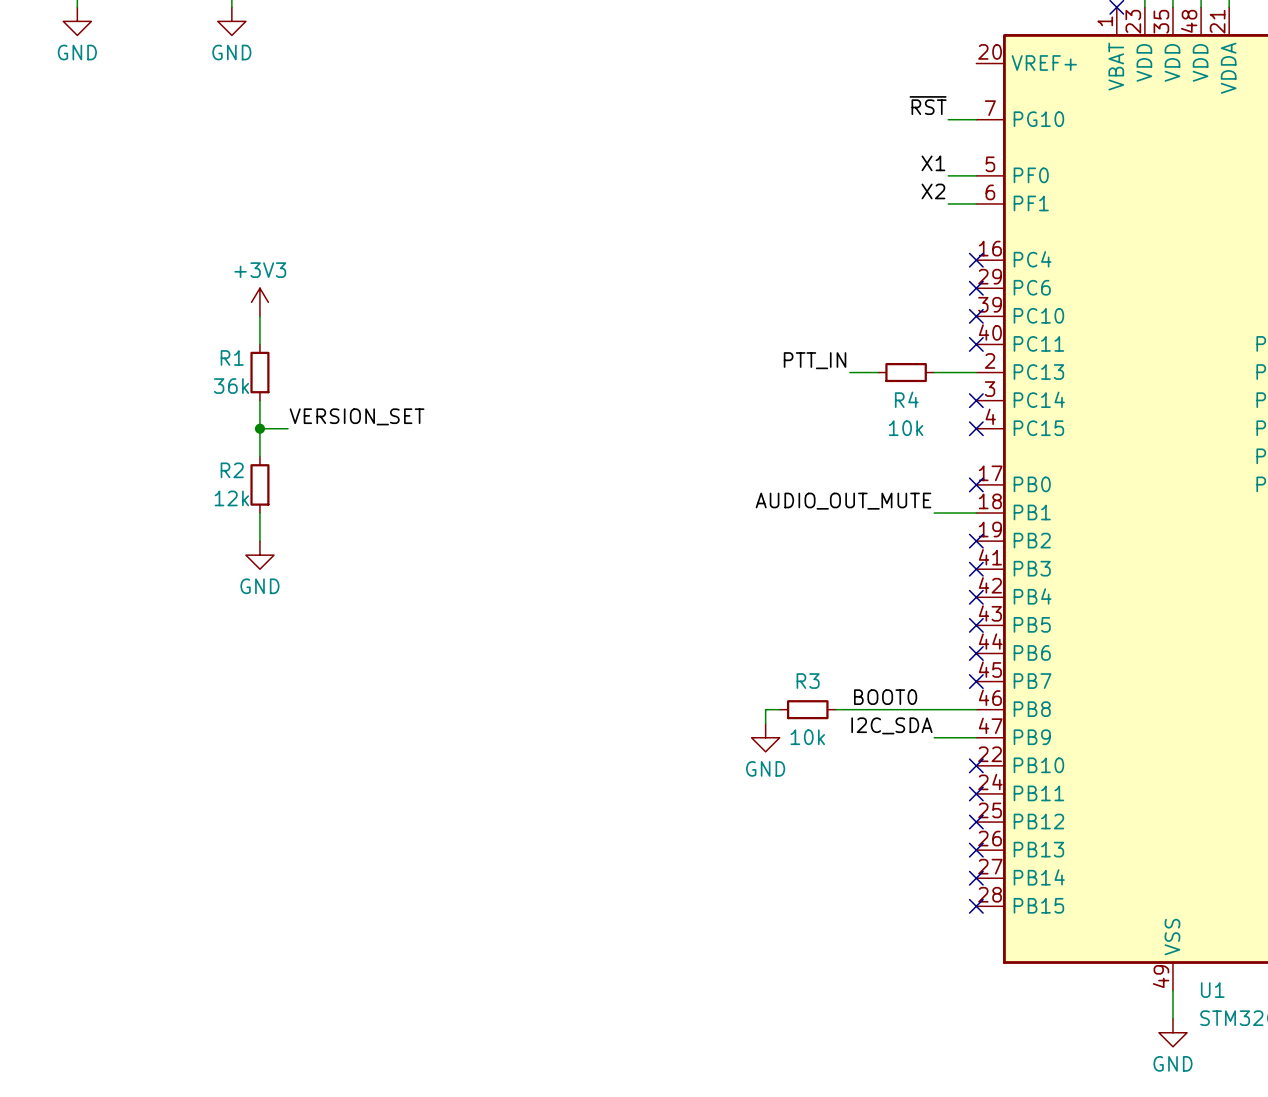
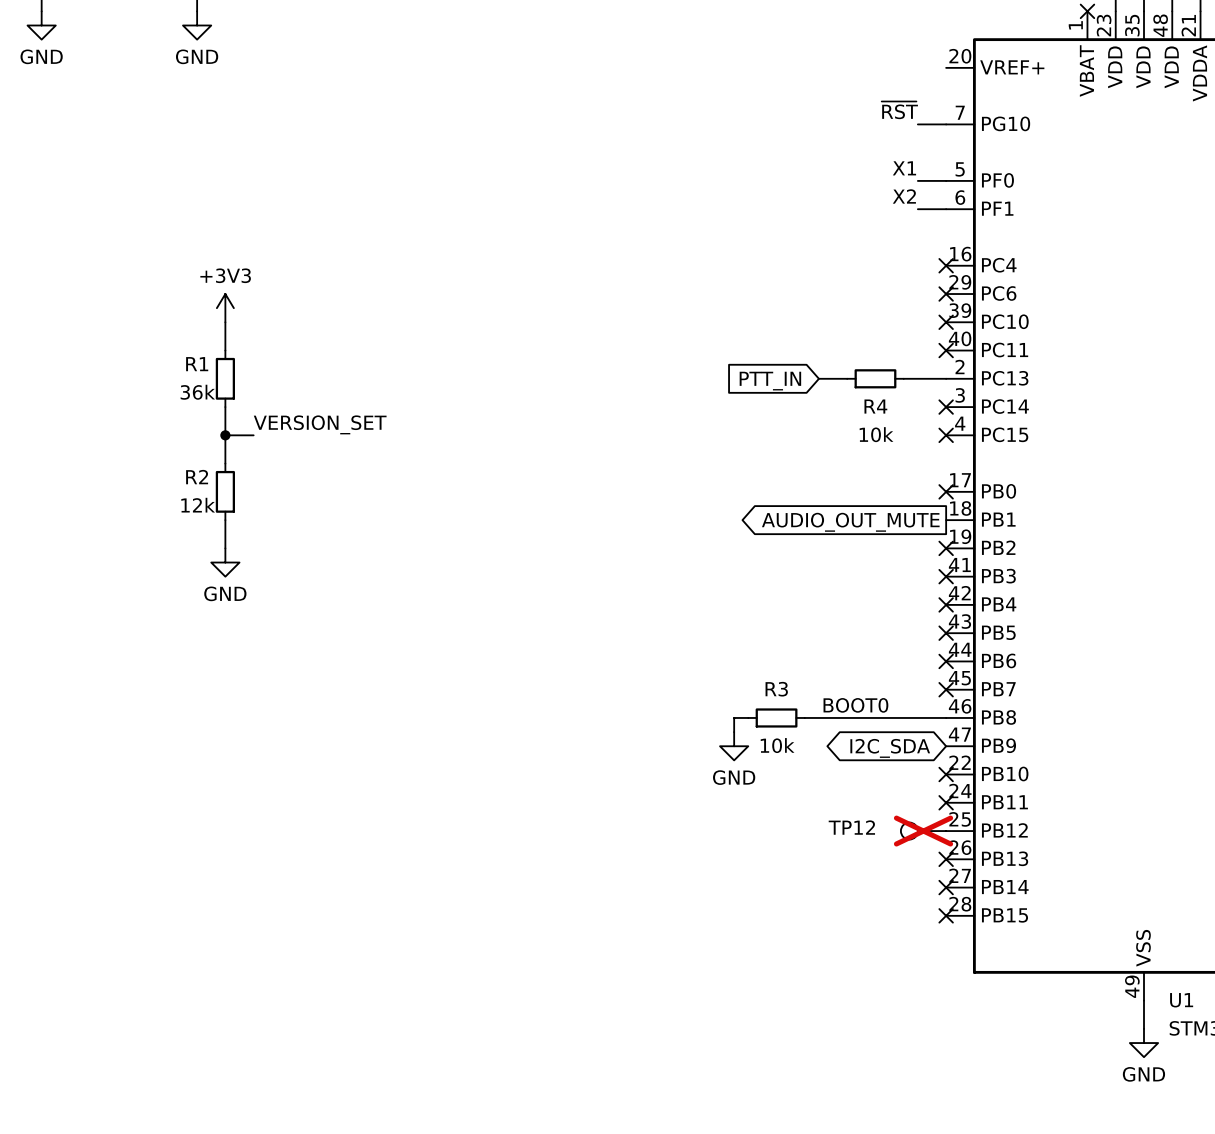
label: PTT_IN (815, 360) -> none
global label: none -> PTT_IN (770, 381)
label: AUDIO_OUT_MUTE (843, 501) -> none
global label: none -> AUDIO_OUT_MUTE (850, 522)
wire: (934, 513) (976, 513) -> none
label: I2C_SDA (891, 725) -> none
wire: (934, 737) (976, 737) -> none
global label: none -> I2C_SDA (890, 748)
TP12: none -> (923, 831)
no-connect mark: (976, 822) -> none

